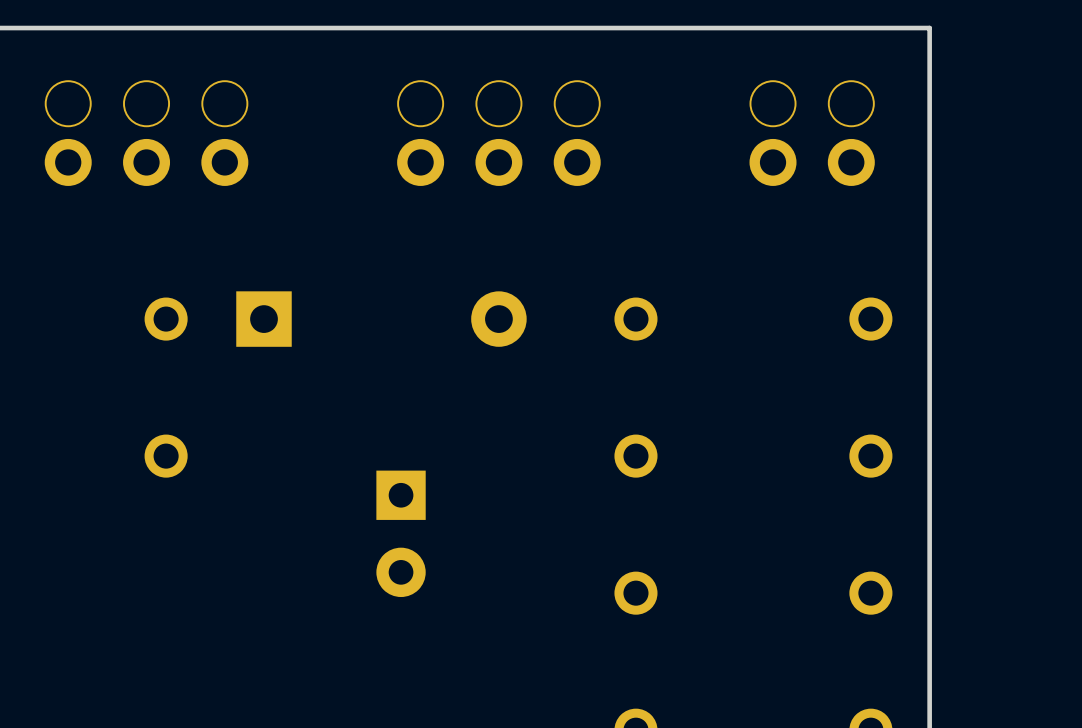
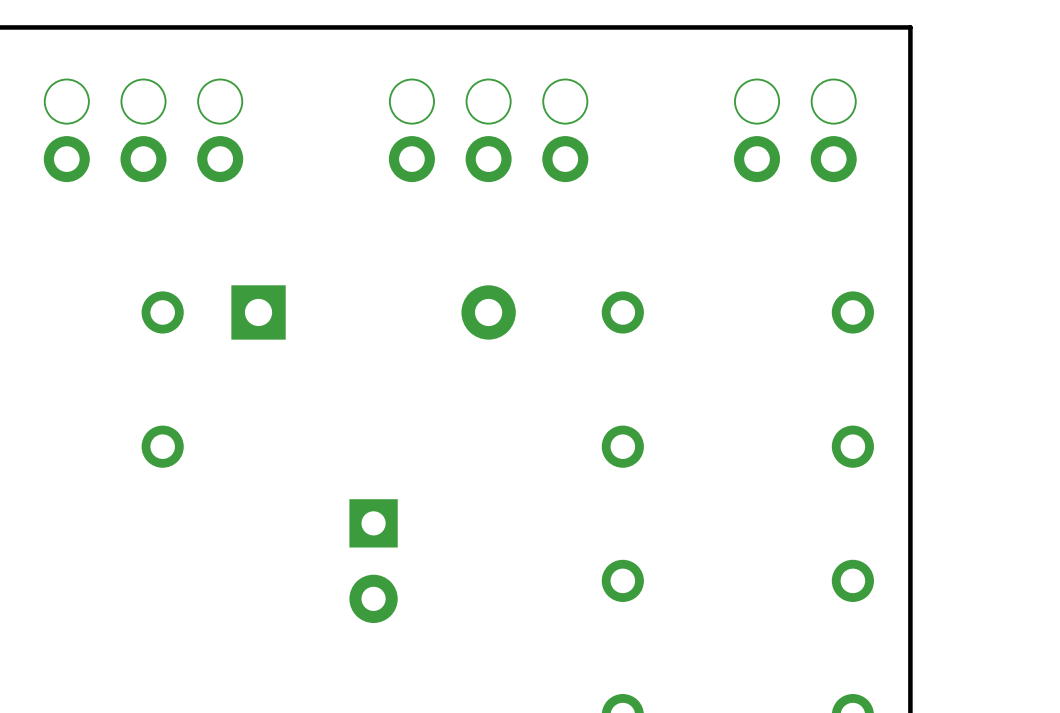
part position: (401, 533) -> (373, 561)

